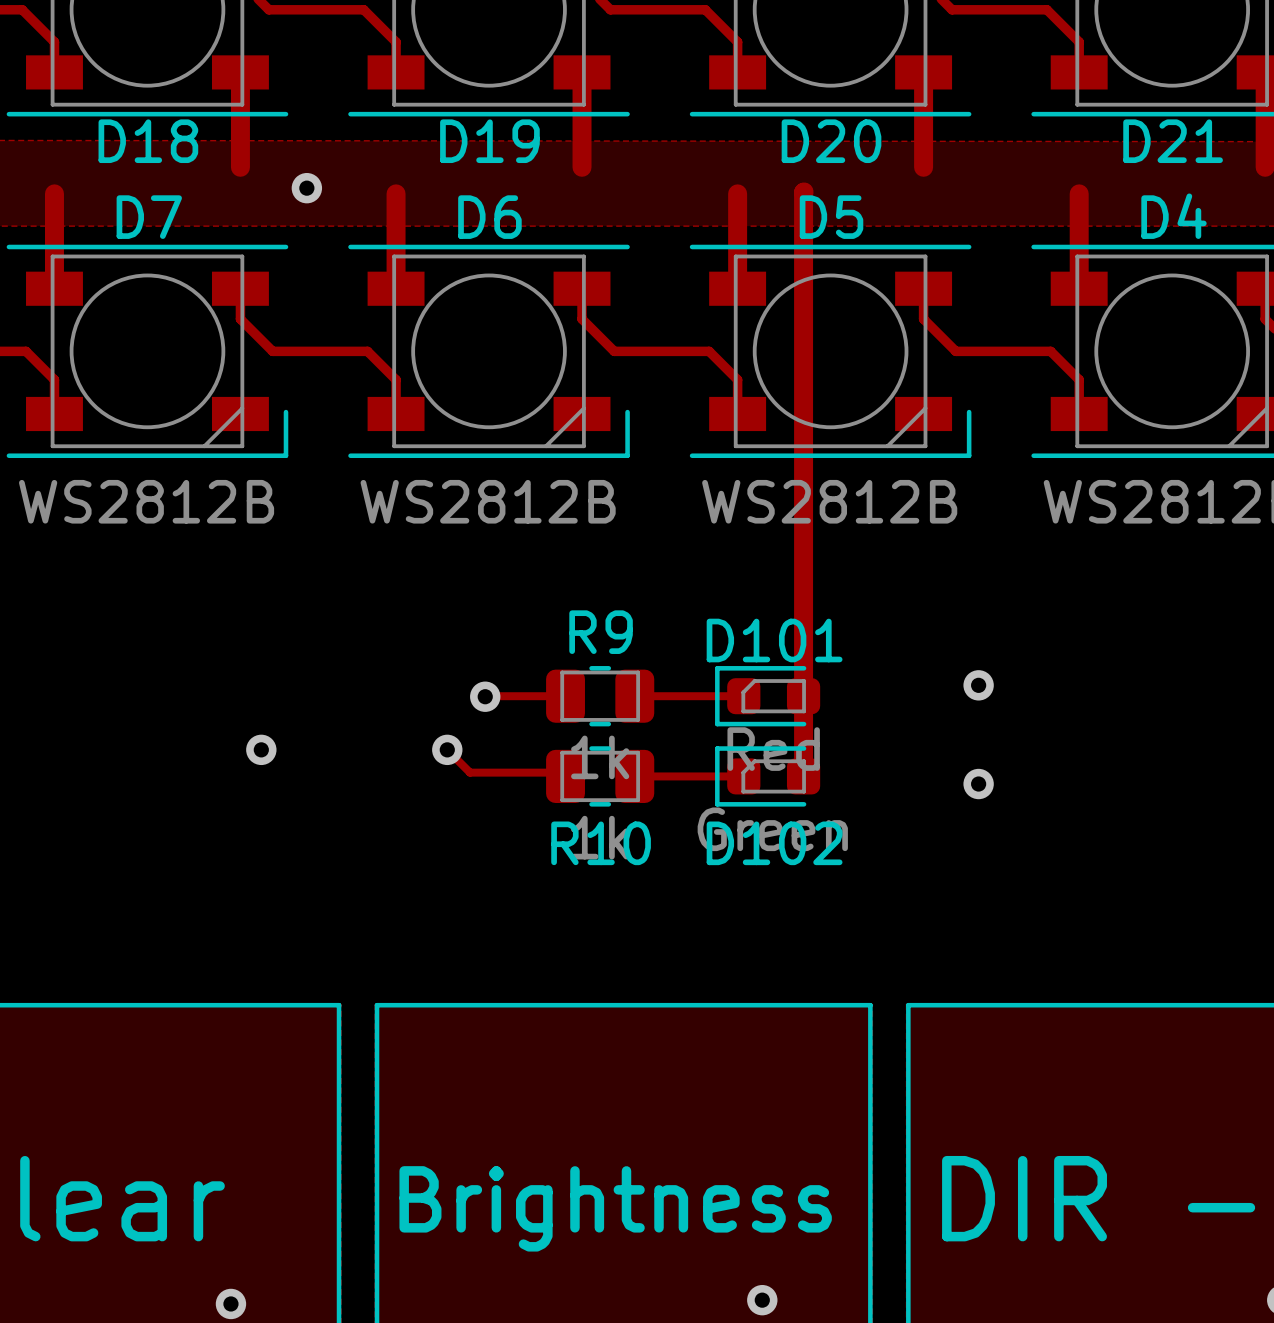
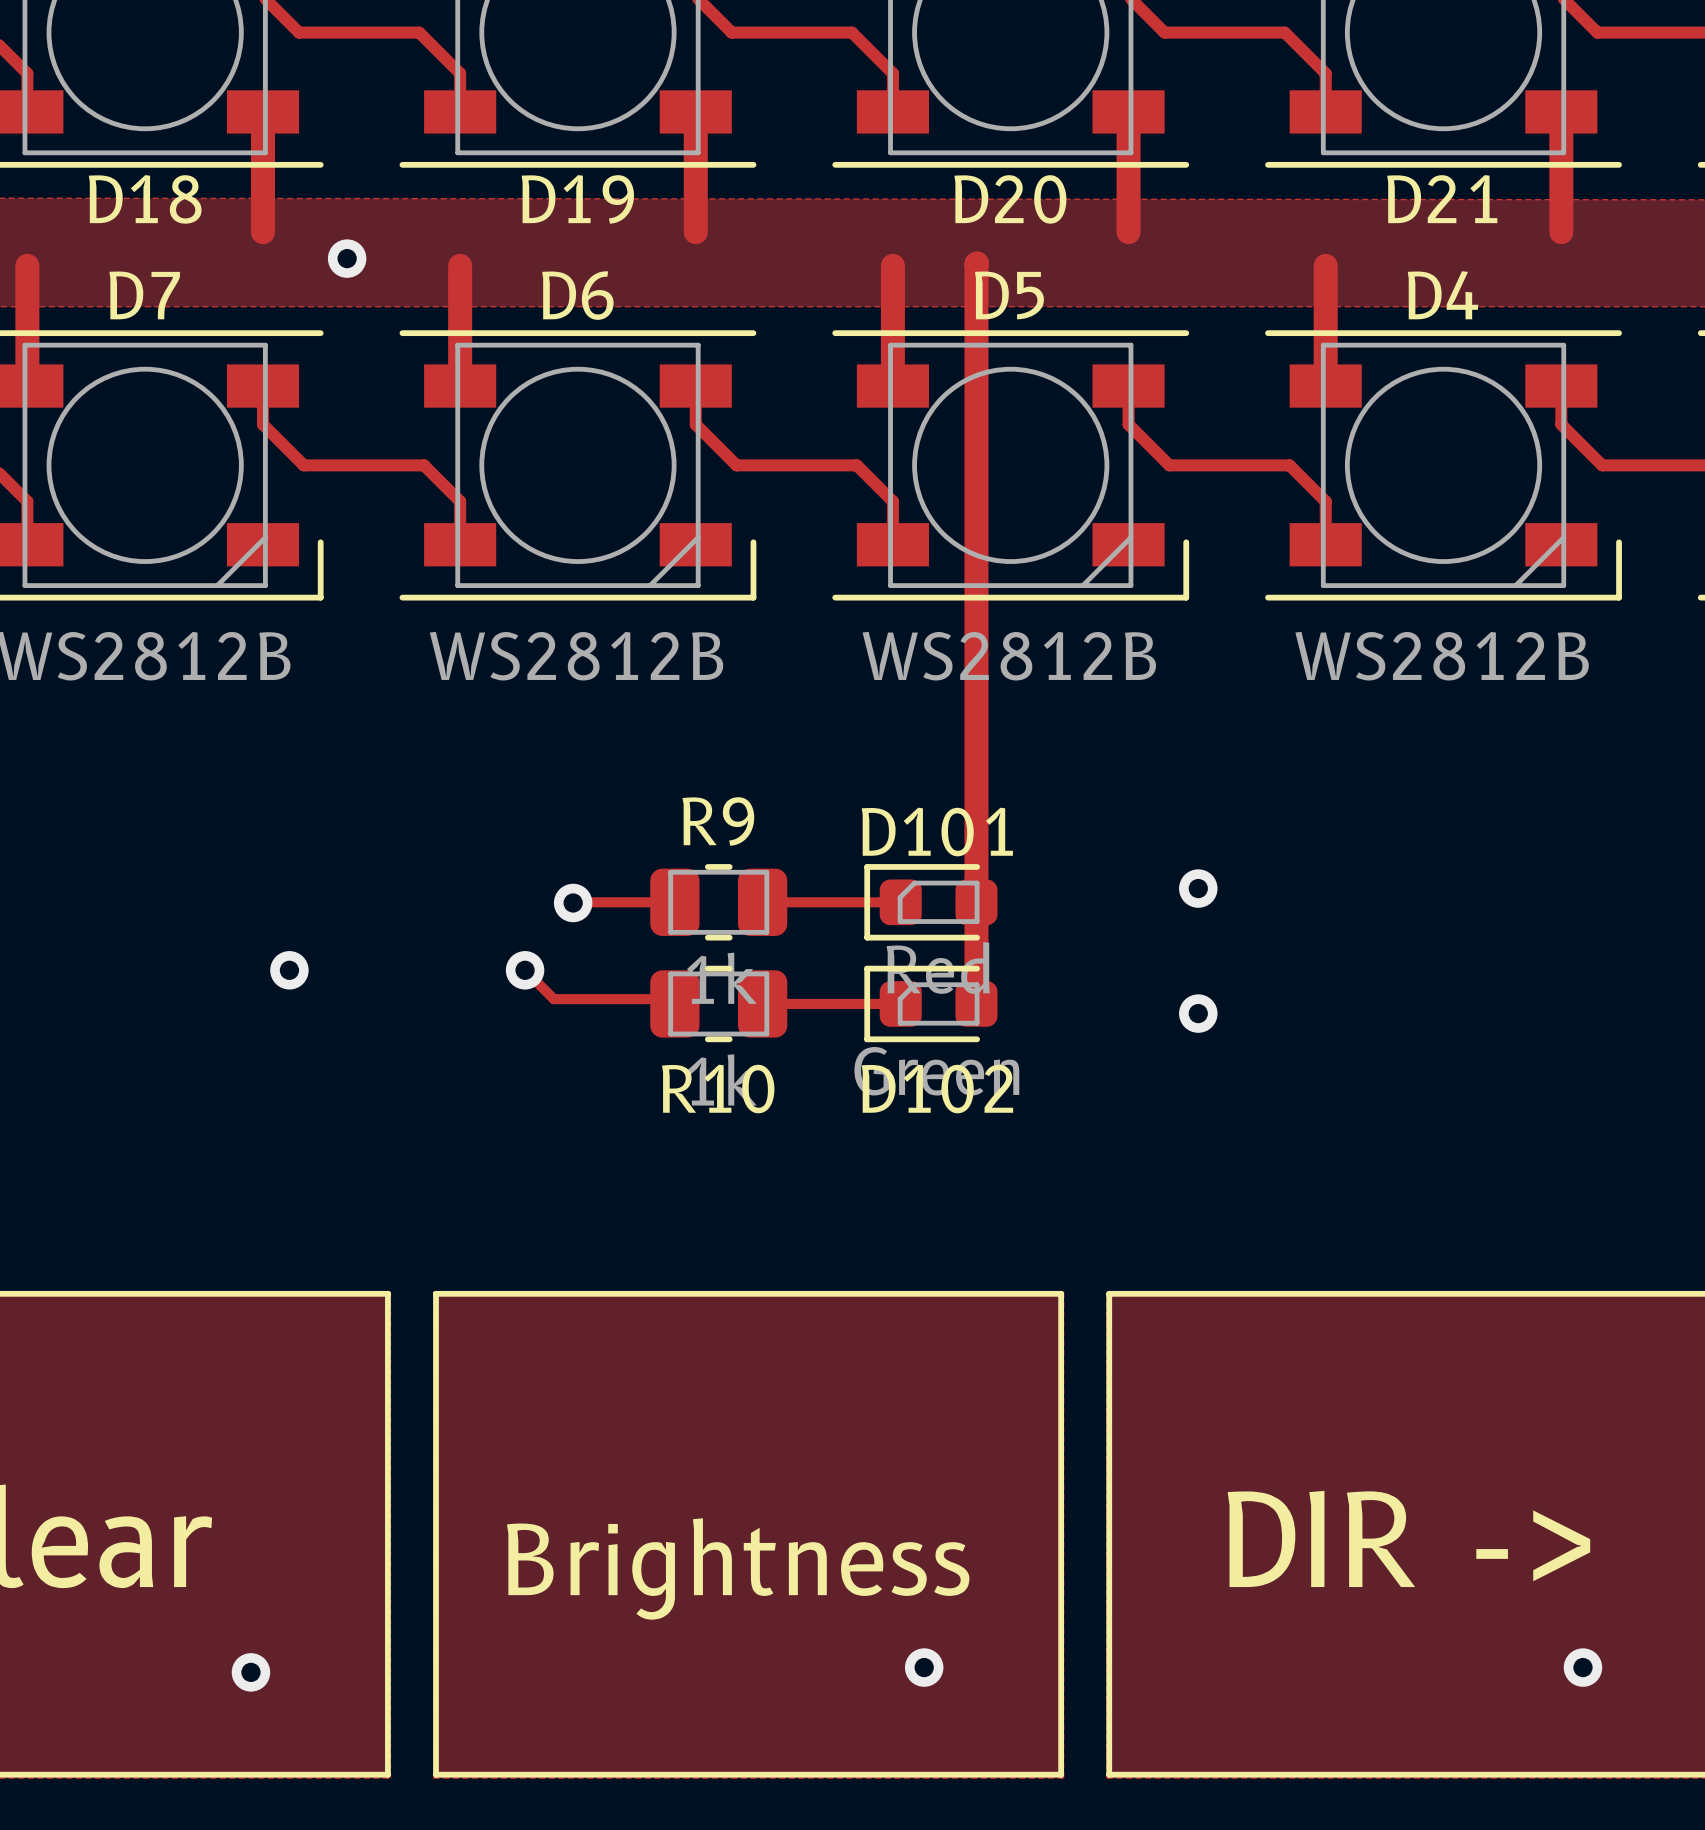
text position: Brightness (615, 1208) -> Brightness (738, 1568)

